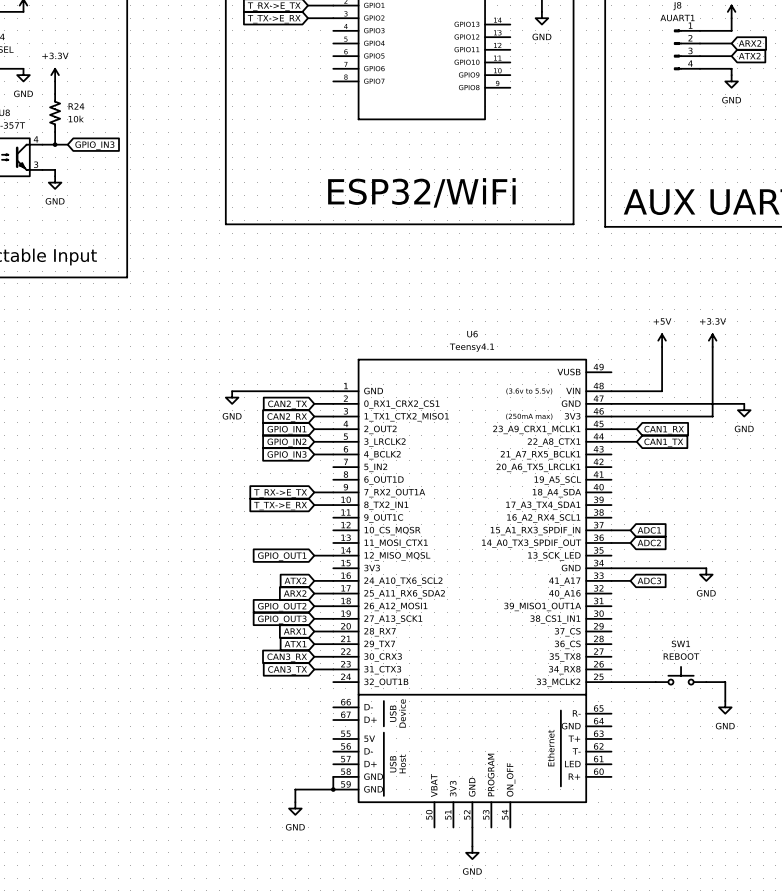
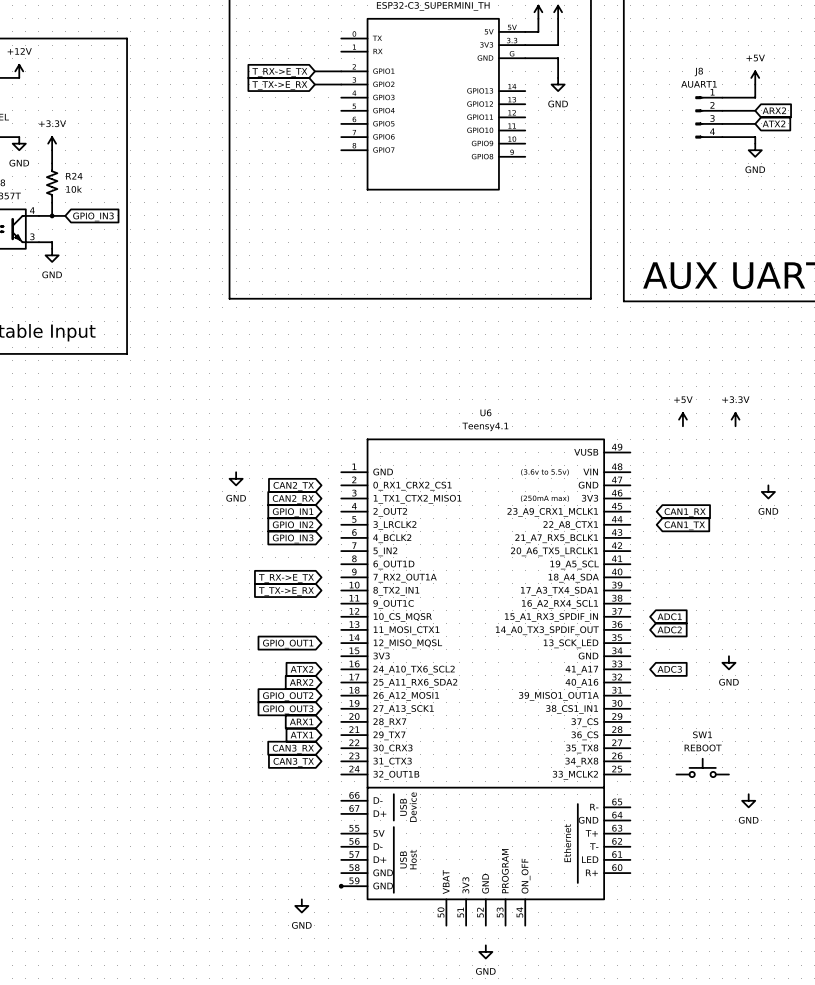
text: ESP32/WiFi (421, 192) -> none
wire: (662, 346) (662, 391) (611, 391) -> none
wire: (712, 346) (712, 416) (611, 416) -> none
wire: (232, 391) (333, 391) -> none
wire: (314, 403) (333, 403) -> none
wire: (611, 403) (744, 403) -> none
wire: (314, 416) (333, 416) -> none
wire: (314, 429) (333, 429) -> none
wire: (611, 429) (636, 429) -> none
wire: (314, 441) (333, 441) -> none
wire: (611, 441) (636, 441) -> none
wire: (314, 454) (333, 454) -> none
wire: (314, 492) (333, 492) -> none
wire: (314, 505) (333, 505) -> none
wire: (611, 530) (630, 530) -> none
wire: (611, 542) (630, 542) -> none
wire: (314, 555) (333, 555) -> none
wire: (611, 568) (706, 568) -> none
wire: (314, 580) (333, 580) -> none
wire: (611, 580) (630, 580) -> none
wire: (314, 593) (333, 593) -> none
wire: (314, 606) (333, 606) -> none
wire: (314, 618) (333, 618) -> none
wire: (314, 631) (333, 631) -> none
wire: (314, 644) (333, 644) -> none
wire: (314, 656) (333, 656) -> none
wire: (314, 669) (333, 669) -> none
wire: (611, 682) (655, 682) -> none
wire: (706, 682) (725, 682) (725, 701) -> none
wire: (333, 776) (333, 789) (295, 789) (295, 802) -> none
wire: (472, 827) (472, 846) -> none

